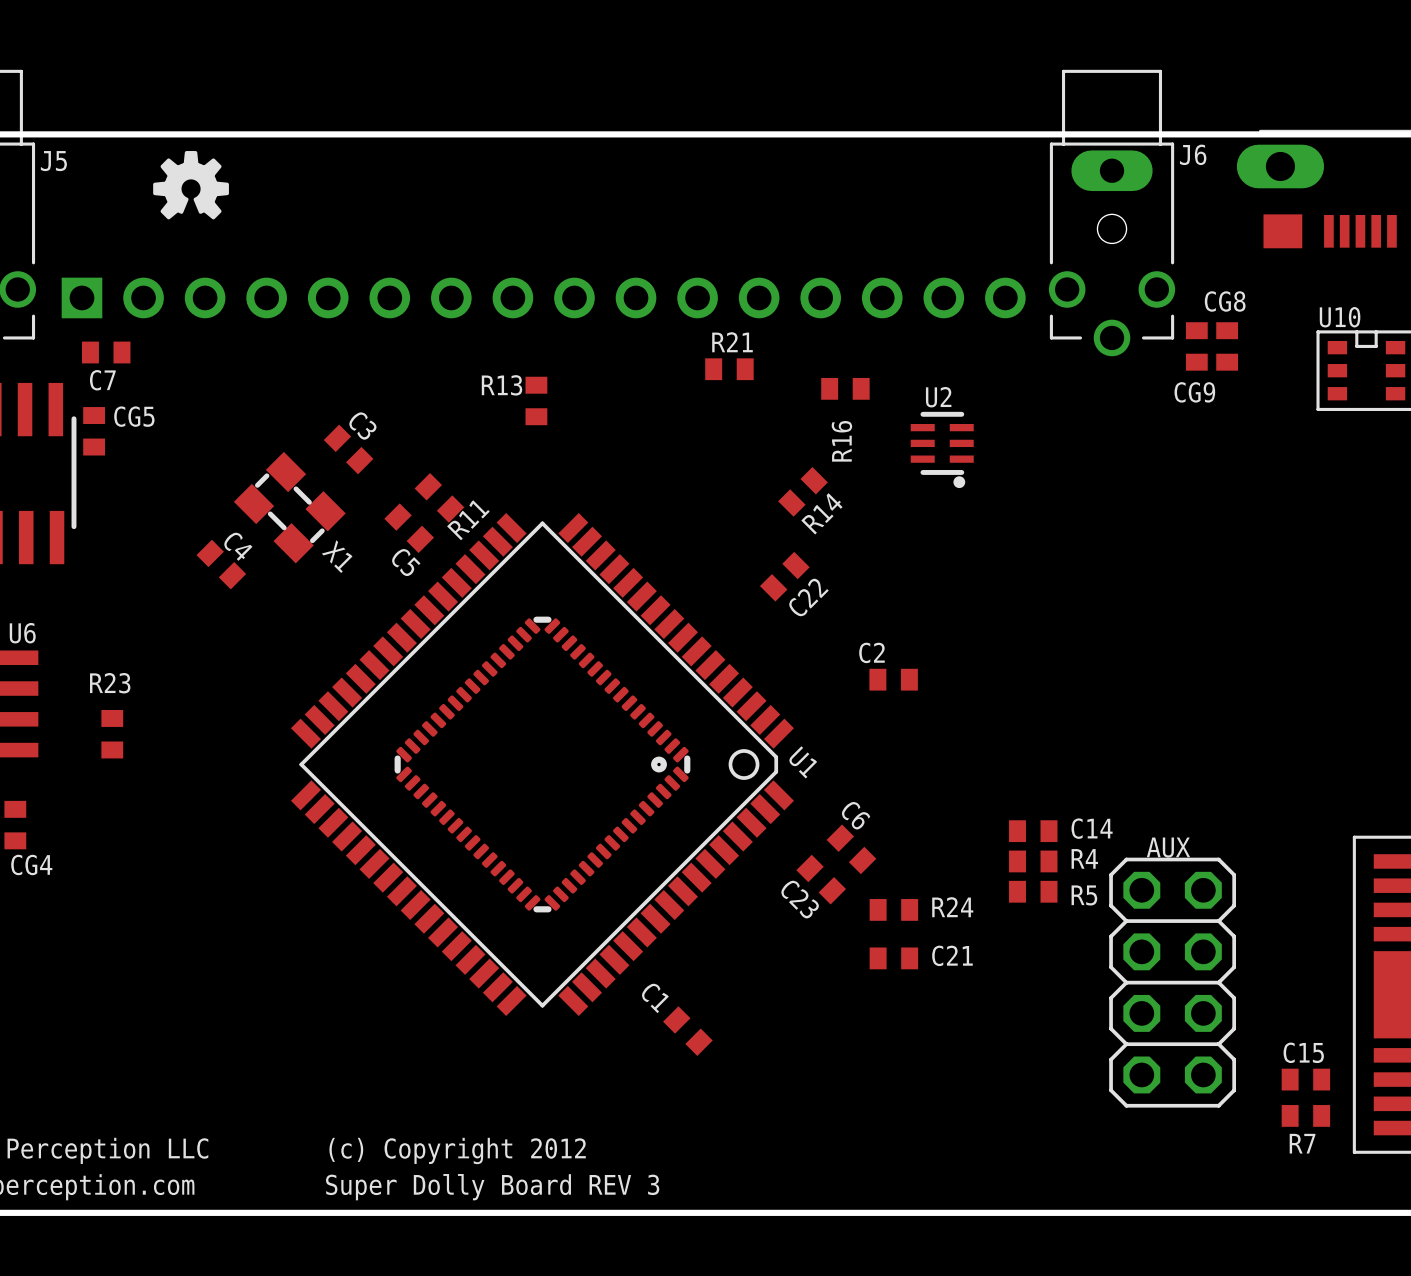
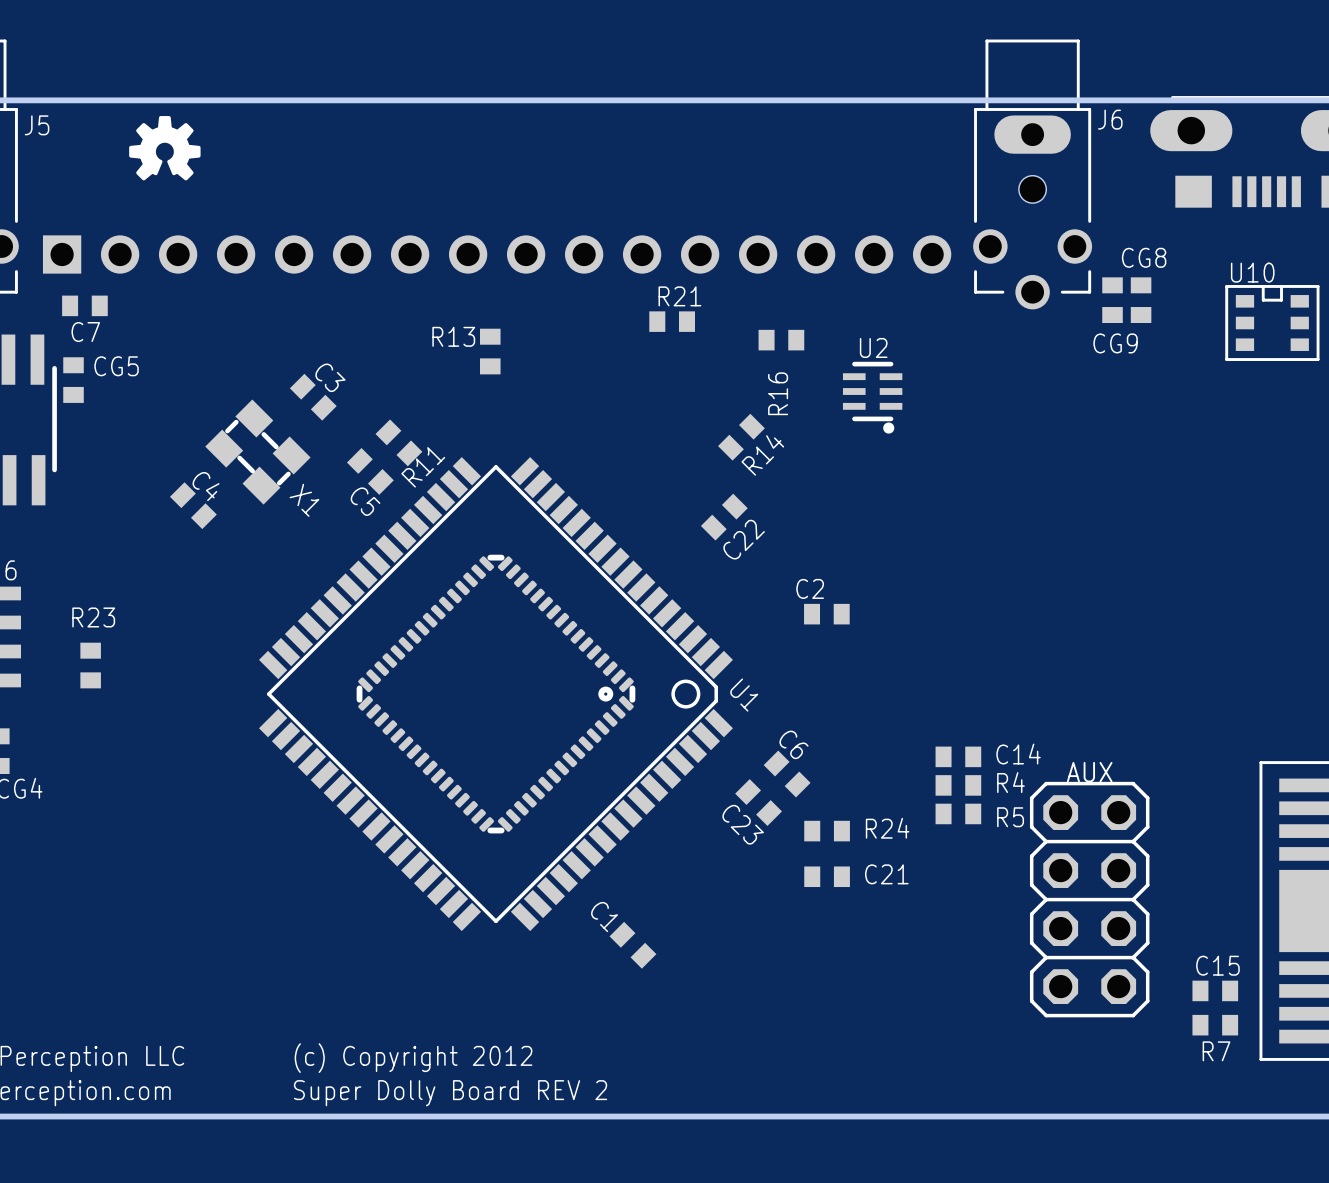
text: Super Dolly Board REV 3 (492, 1187) -> Super Dolly Board REV 2 (450, 1093)

